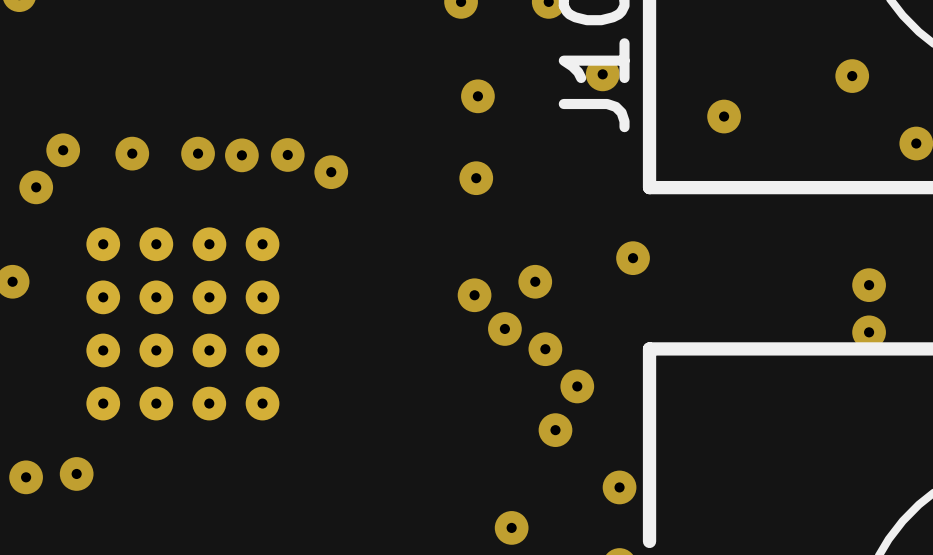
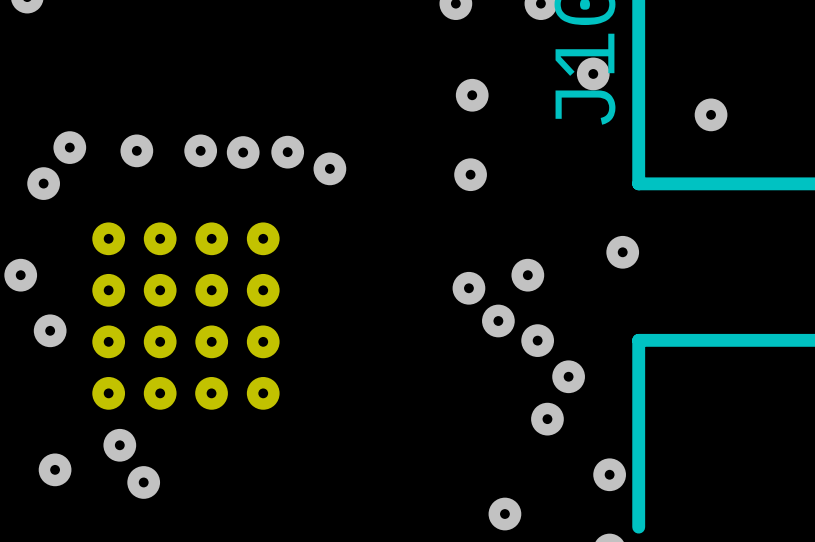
via: none -> (50, 330)
via: none -> (119, 445)
via: (76, 473) -> none
via: (26, 477) -> none
via: none -> (55, 469)
via: none -> (143, 482)

